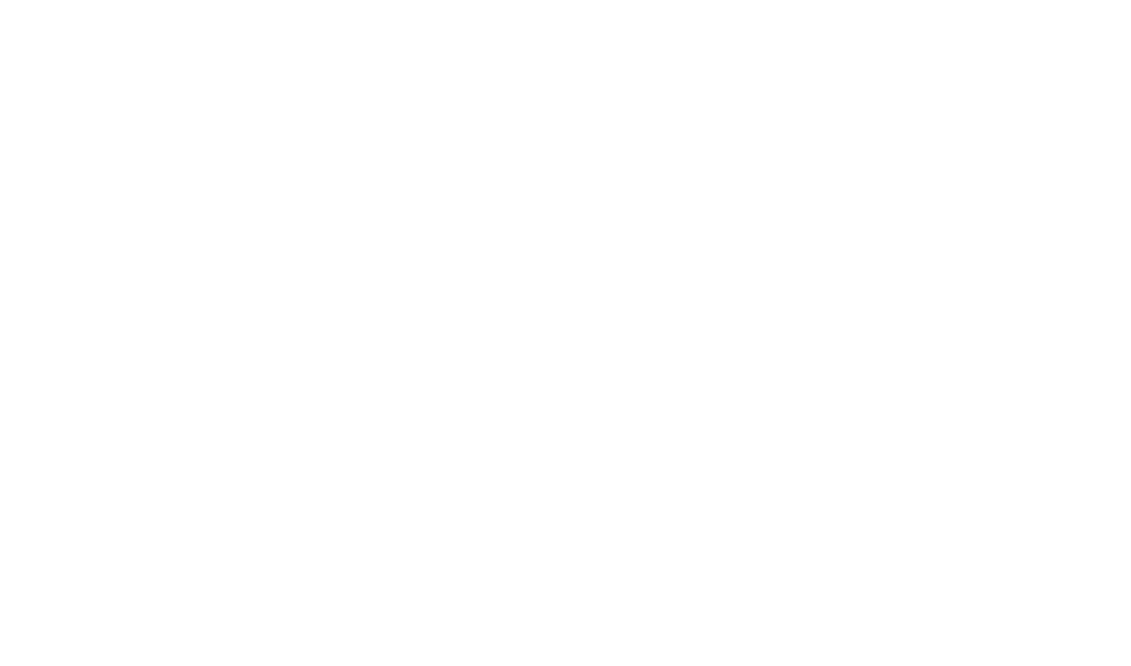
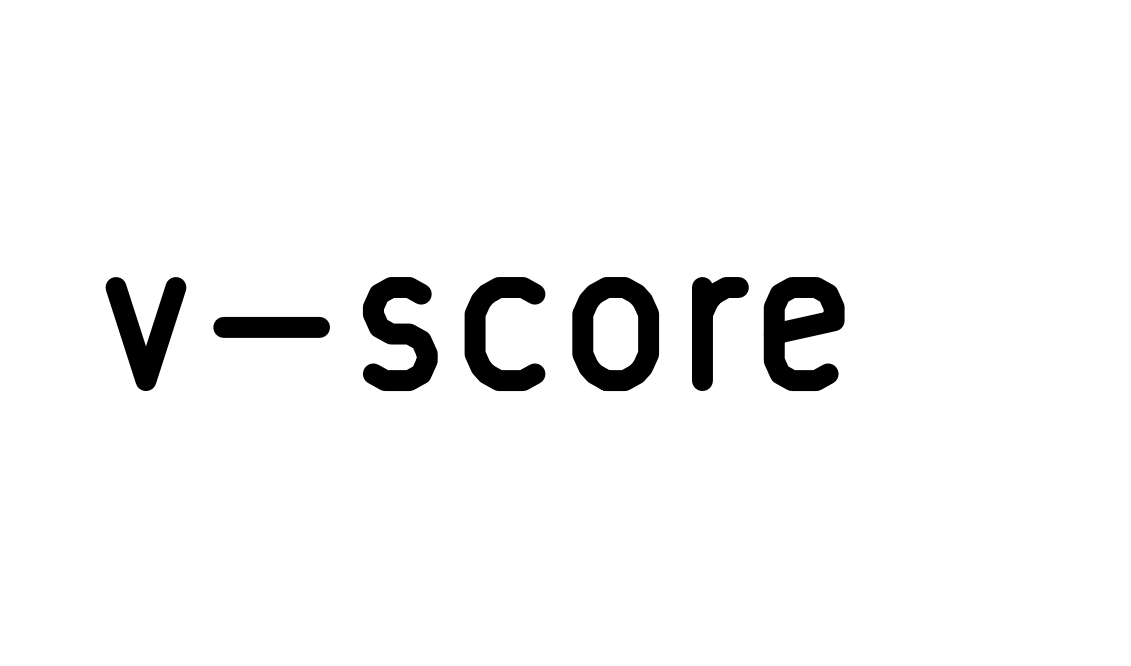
text: none -> v-score (475, 334)

